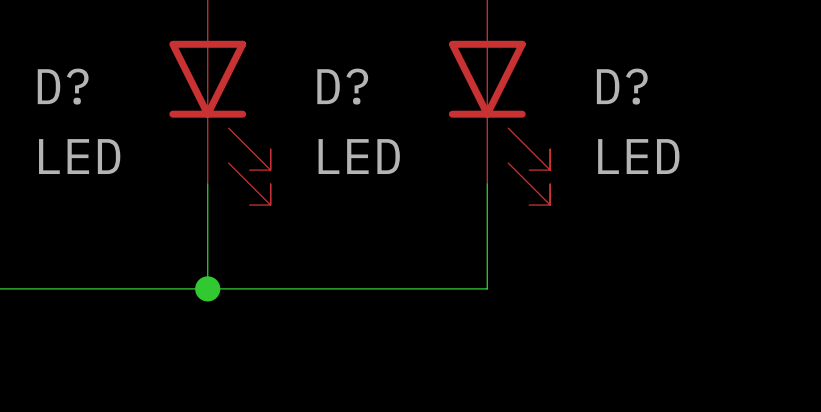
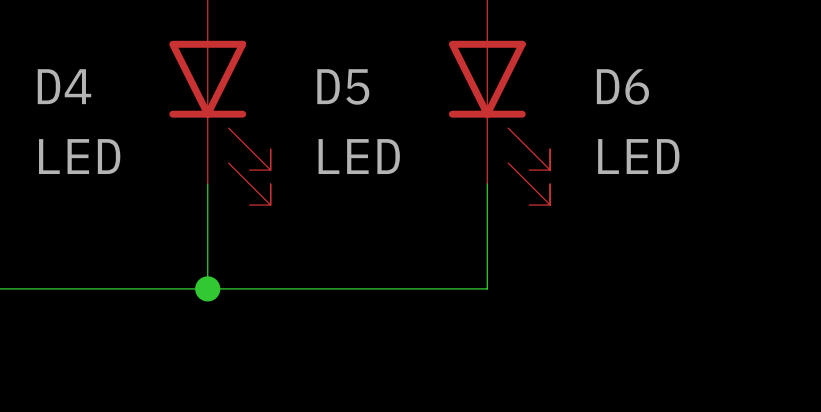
D? name: D? (63, 86) -> D4 (64, 86)
D? name: D? (342, 86) -> D5 (343, 86)
D? name: D? (622, 86) -> D6 (622, 86)

